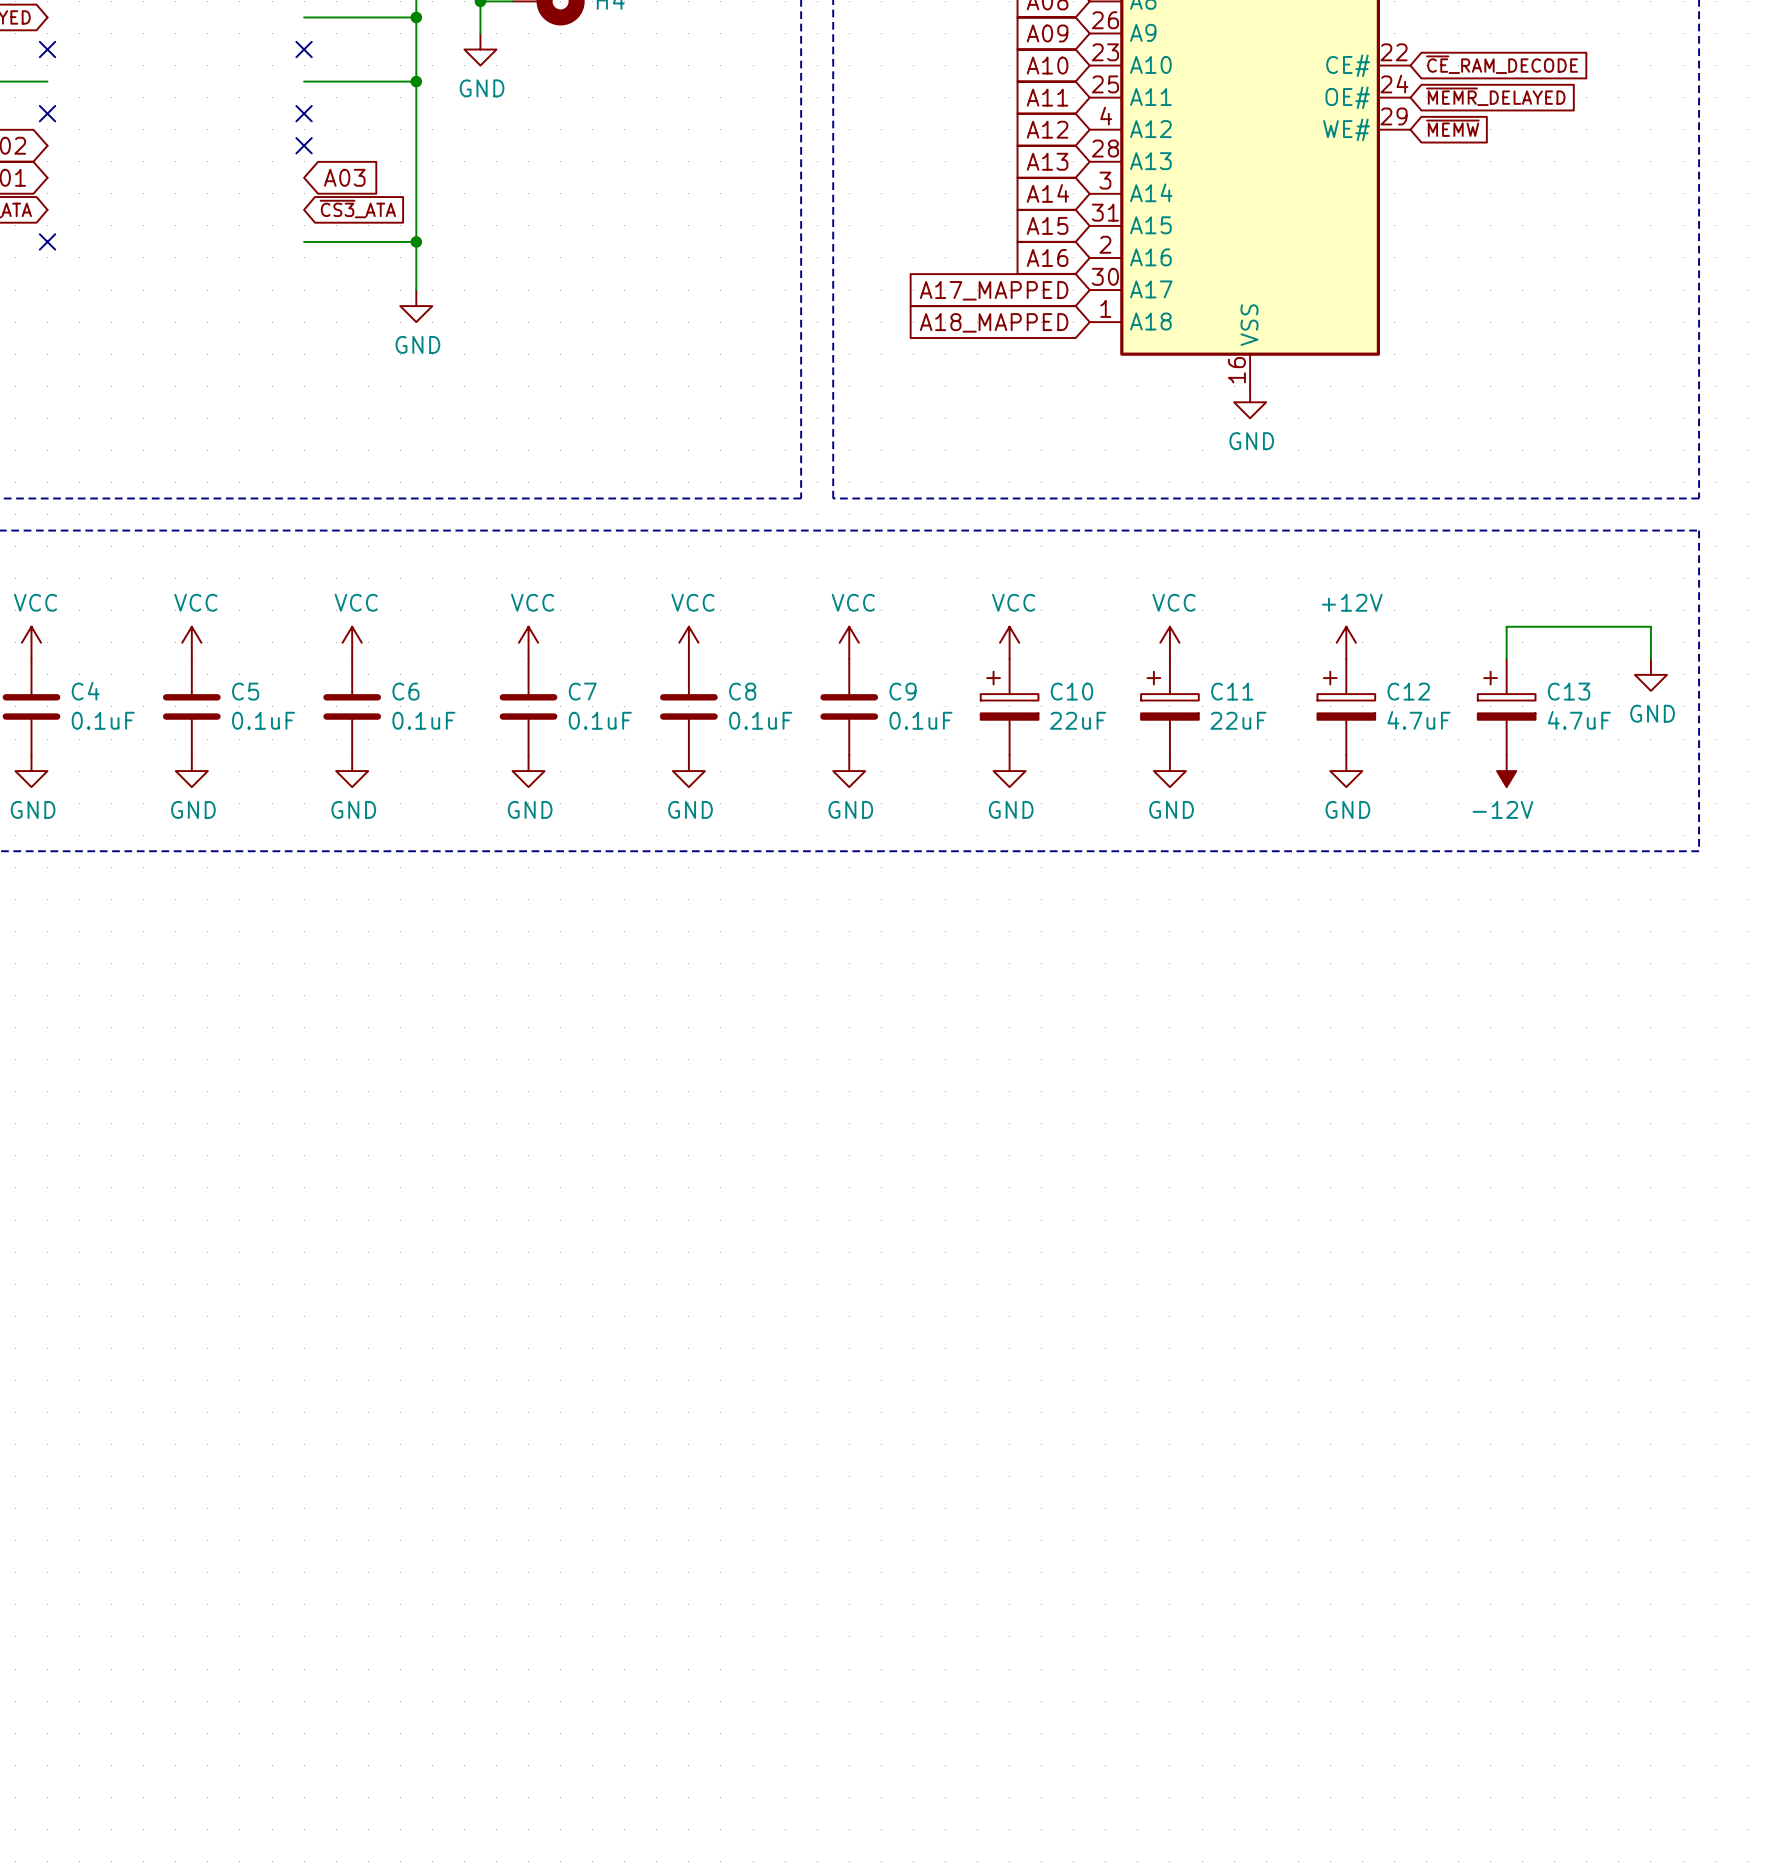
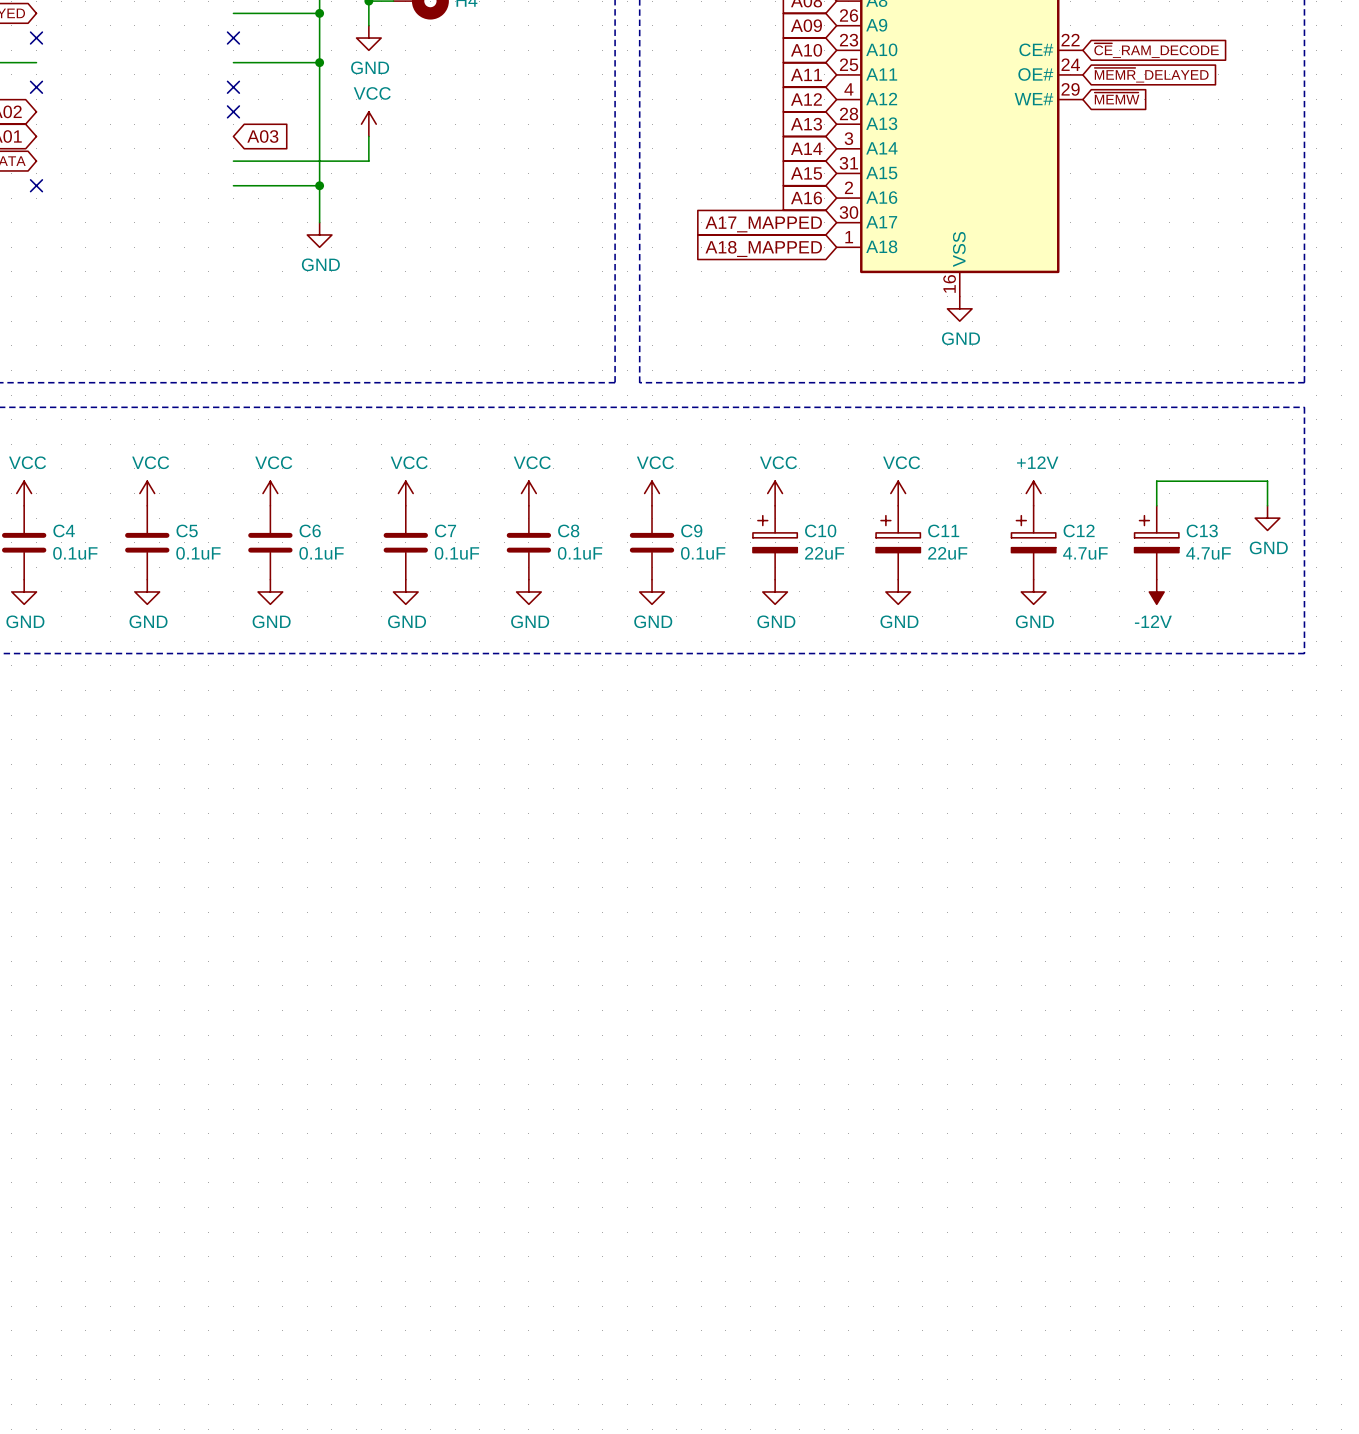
power symbol: none -> VCC (368, 124)
wire: none -> (368, 136) (368, 161) (233, 161)
global label: ~{CS3}_ATA (357, 209) -> none

